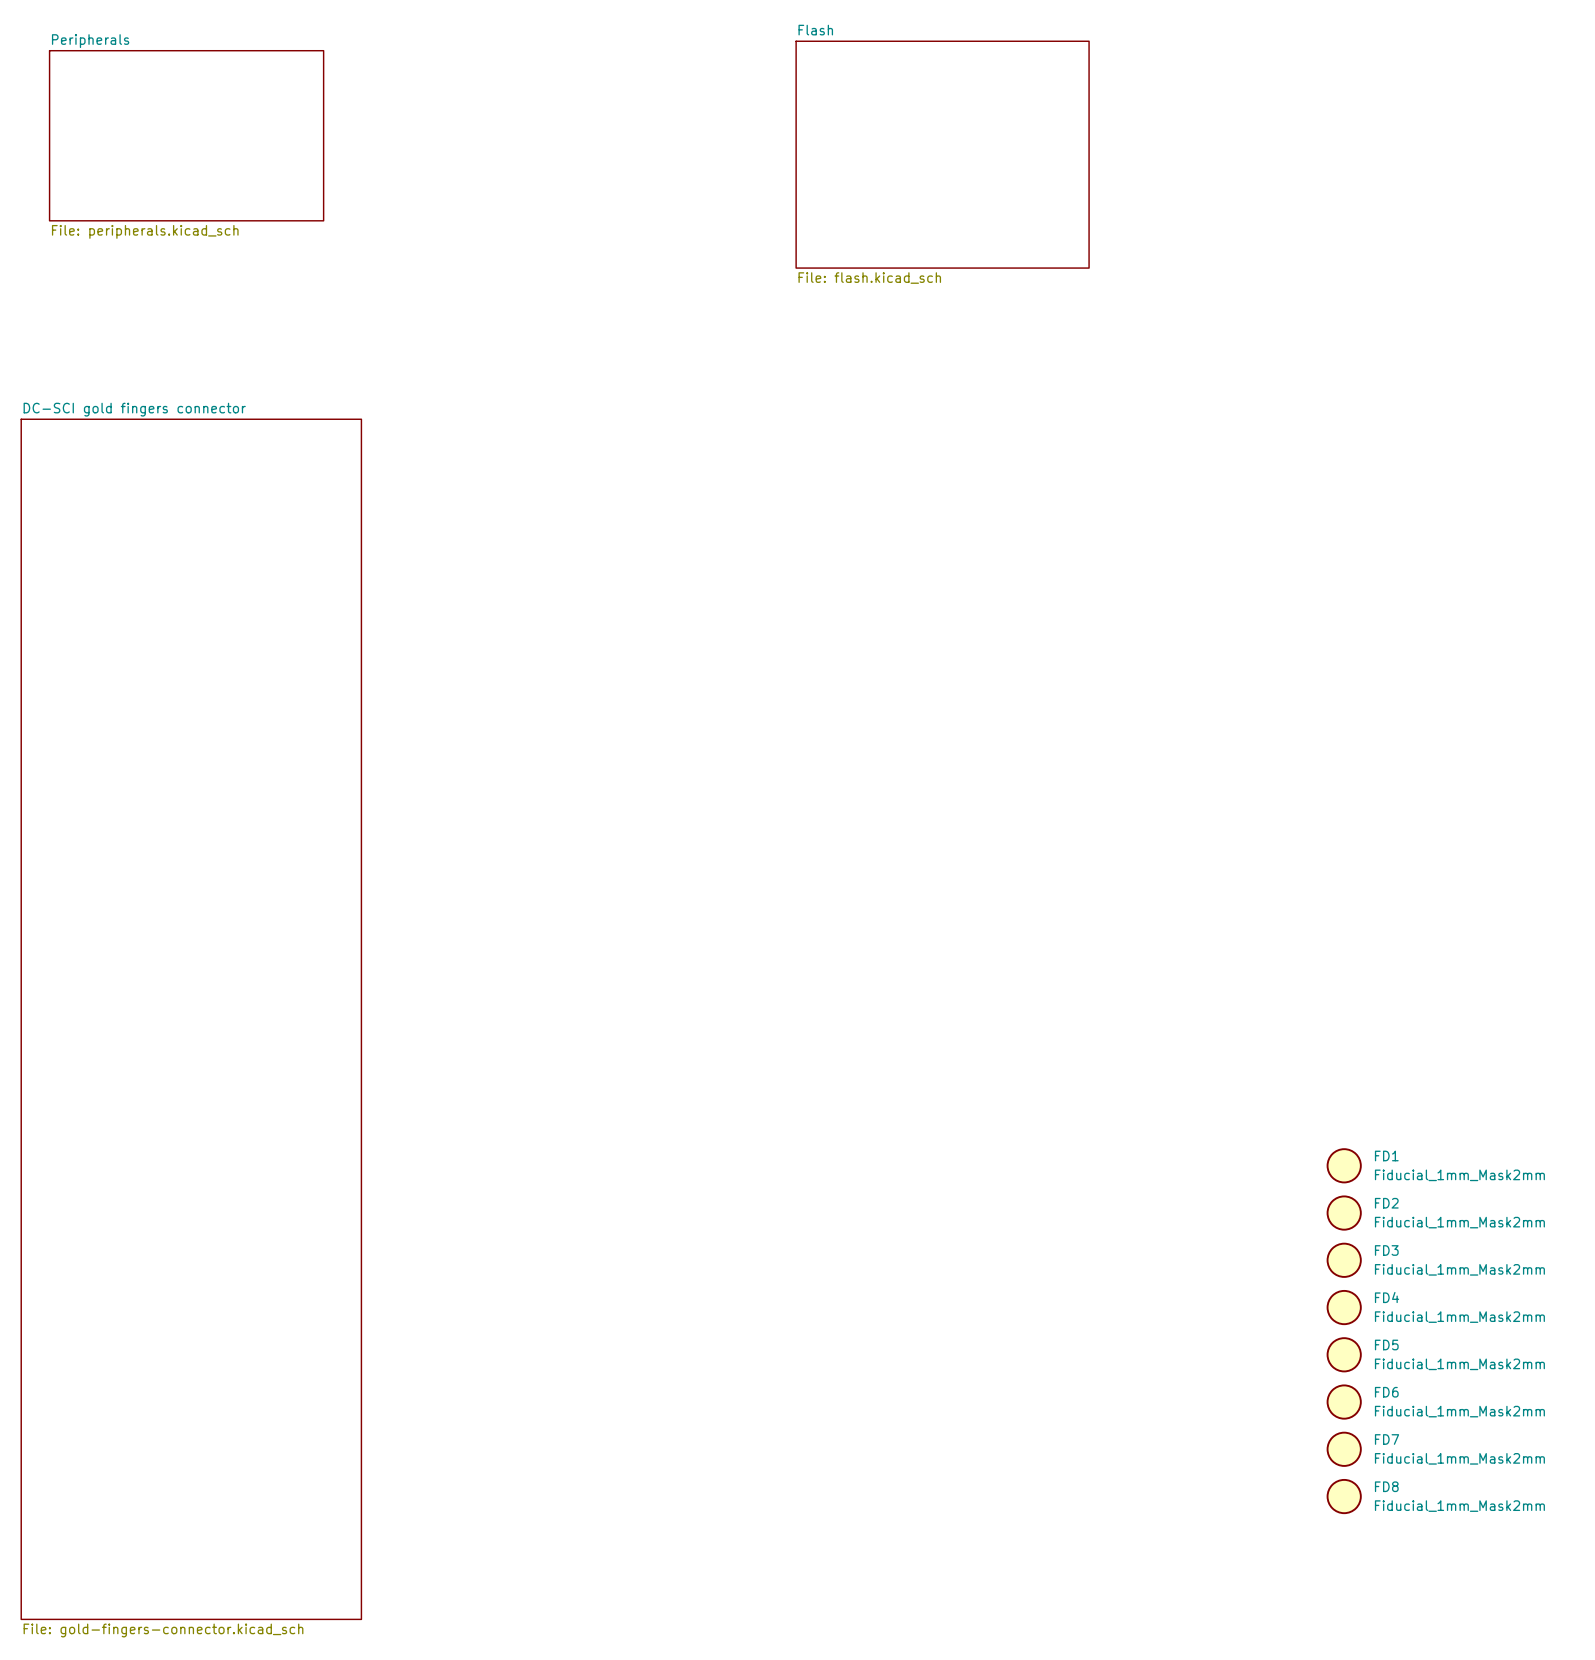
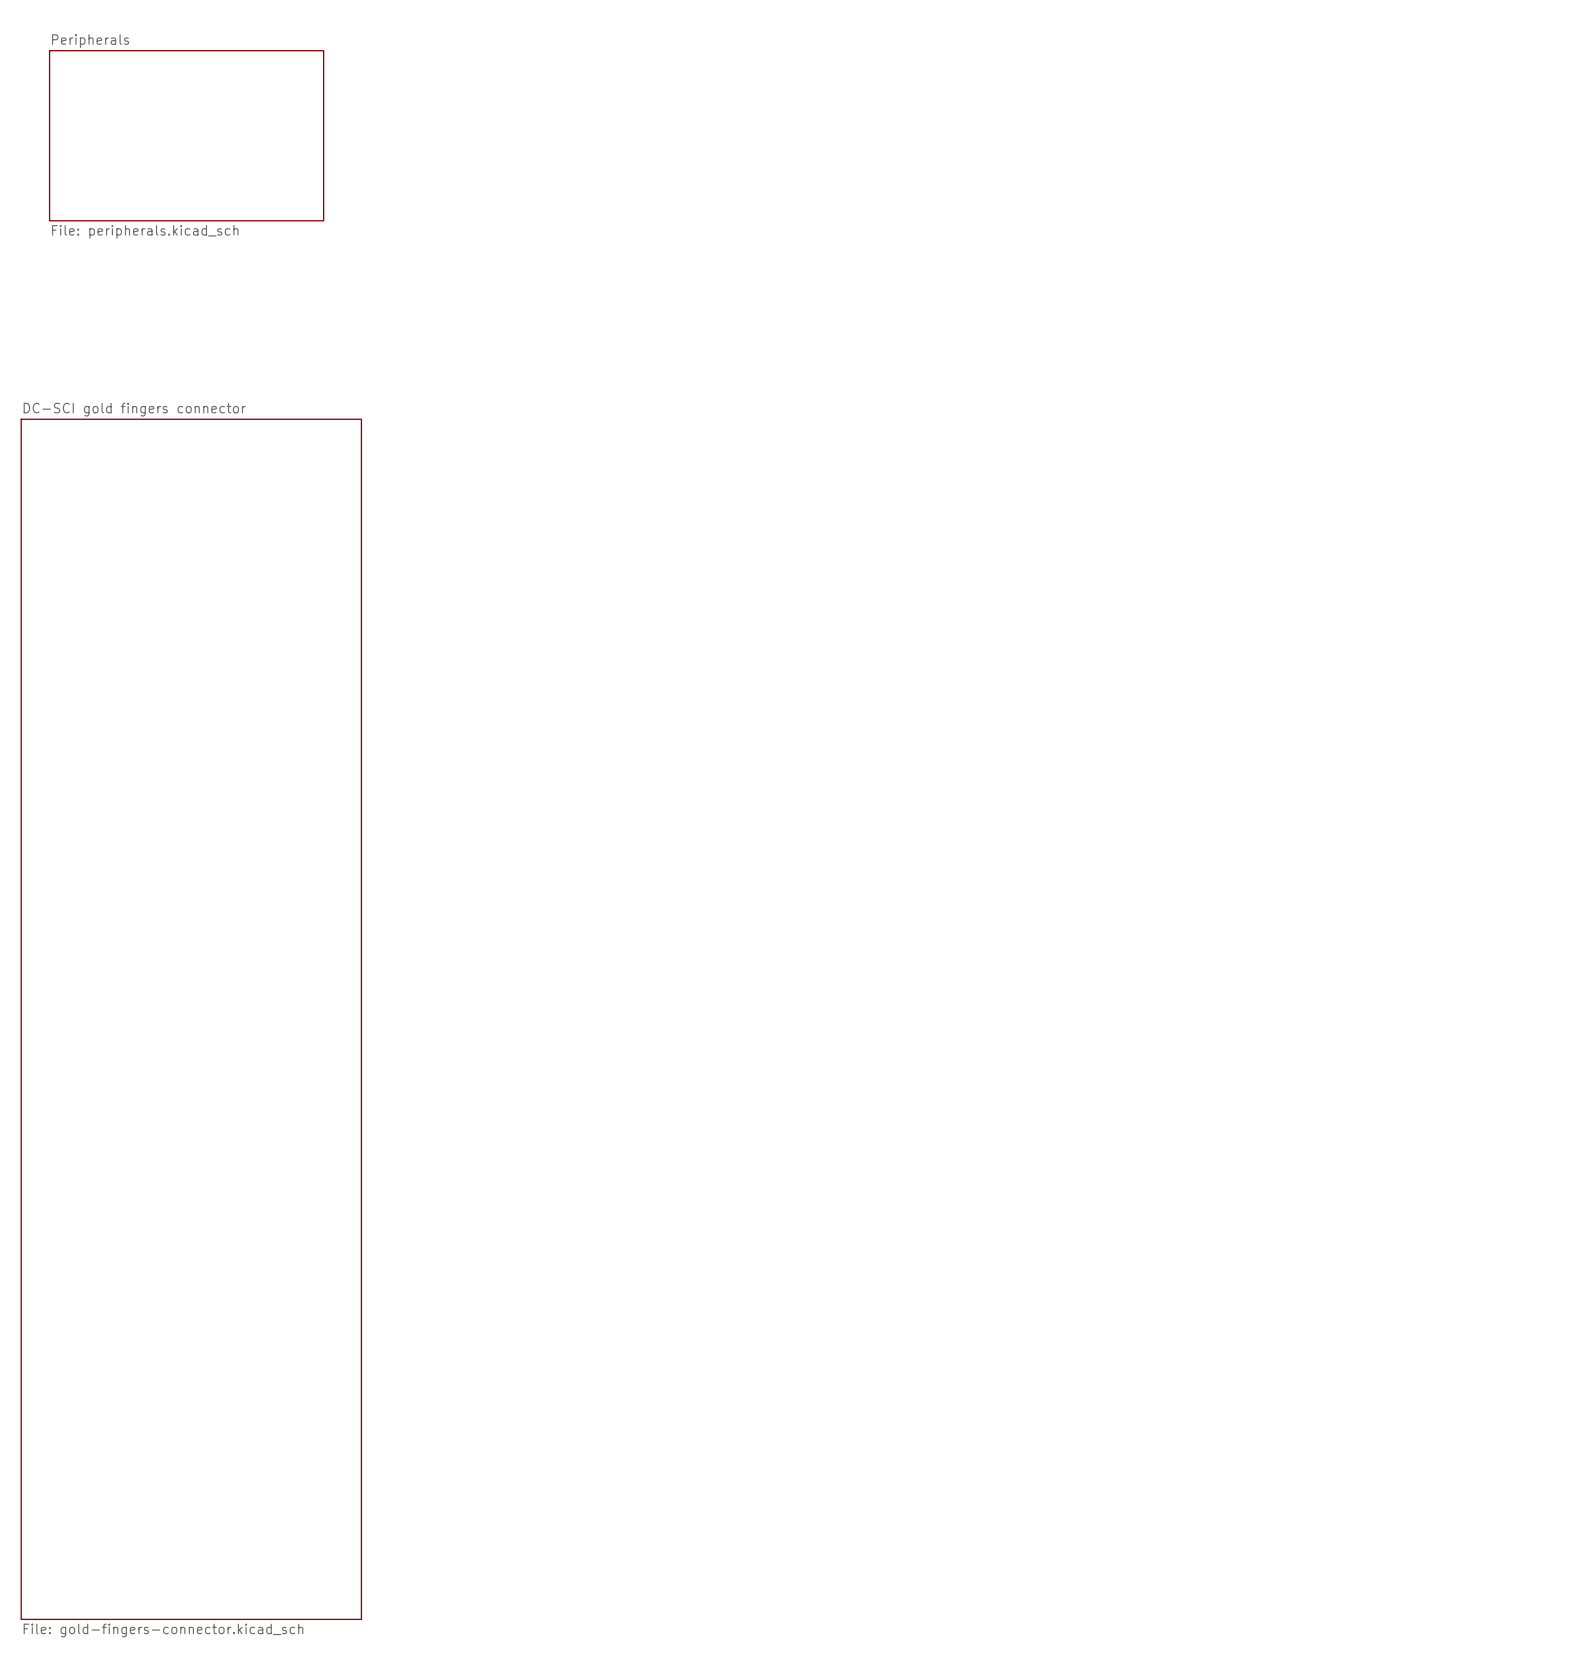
sheet Flash: File: flash.kicad_sch (942, 154) -> none
FD1: Fiducial_1mm_Mask2mm (1344, 1165) -> none
FD2: Fiducial_1mm_Mask2mm (1344, 1213) -> none
FD3: Fiducial_1mm_Mask2mm (1344, 1260) -> none
FD4: Fiducial_1mm_Mask2mm (1344, 1307) -> none
FD5: Fiducial_1mm_Mask2mm (1344, 1354) -> none
FD6: Fiducial_1mm_Mask2mm (1344, 1402) -> none
FD7: Fiducial_1mm_Mask2mm (1344, 1449) -> none
FD8: Fiducial_1mm_Mask2mm (1344, 1496) -> none

